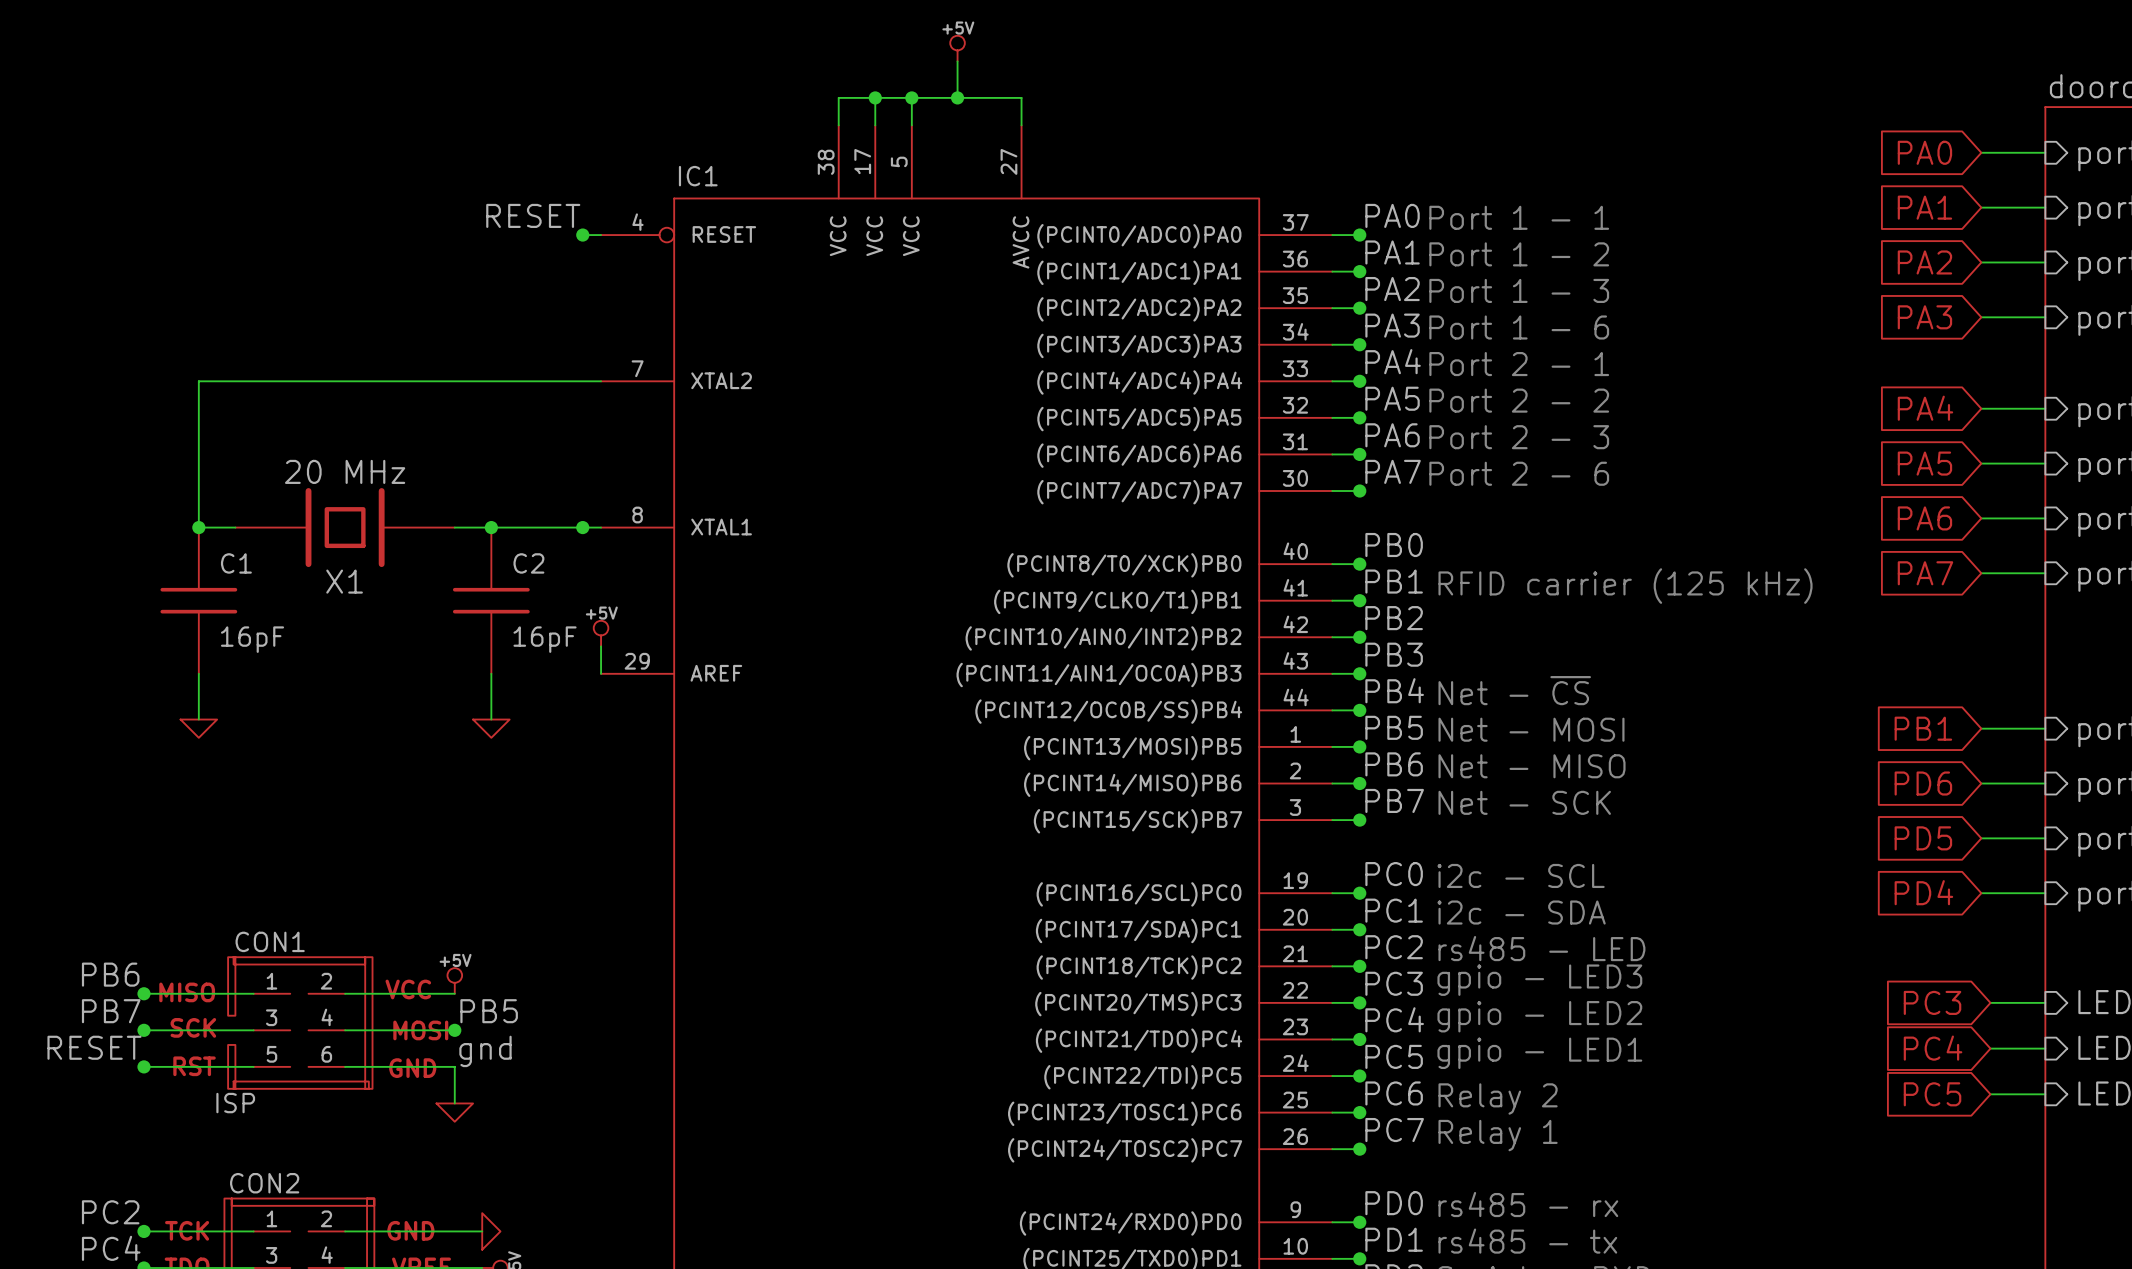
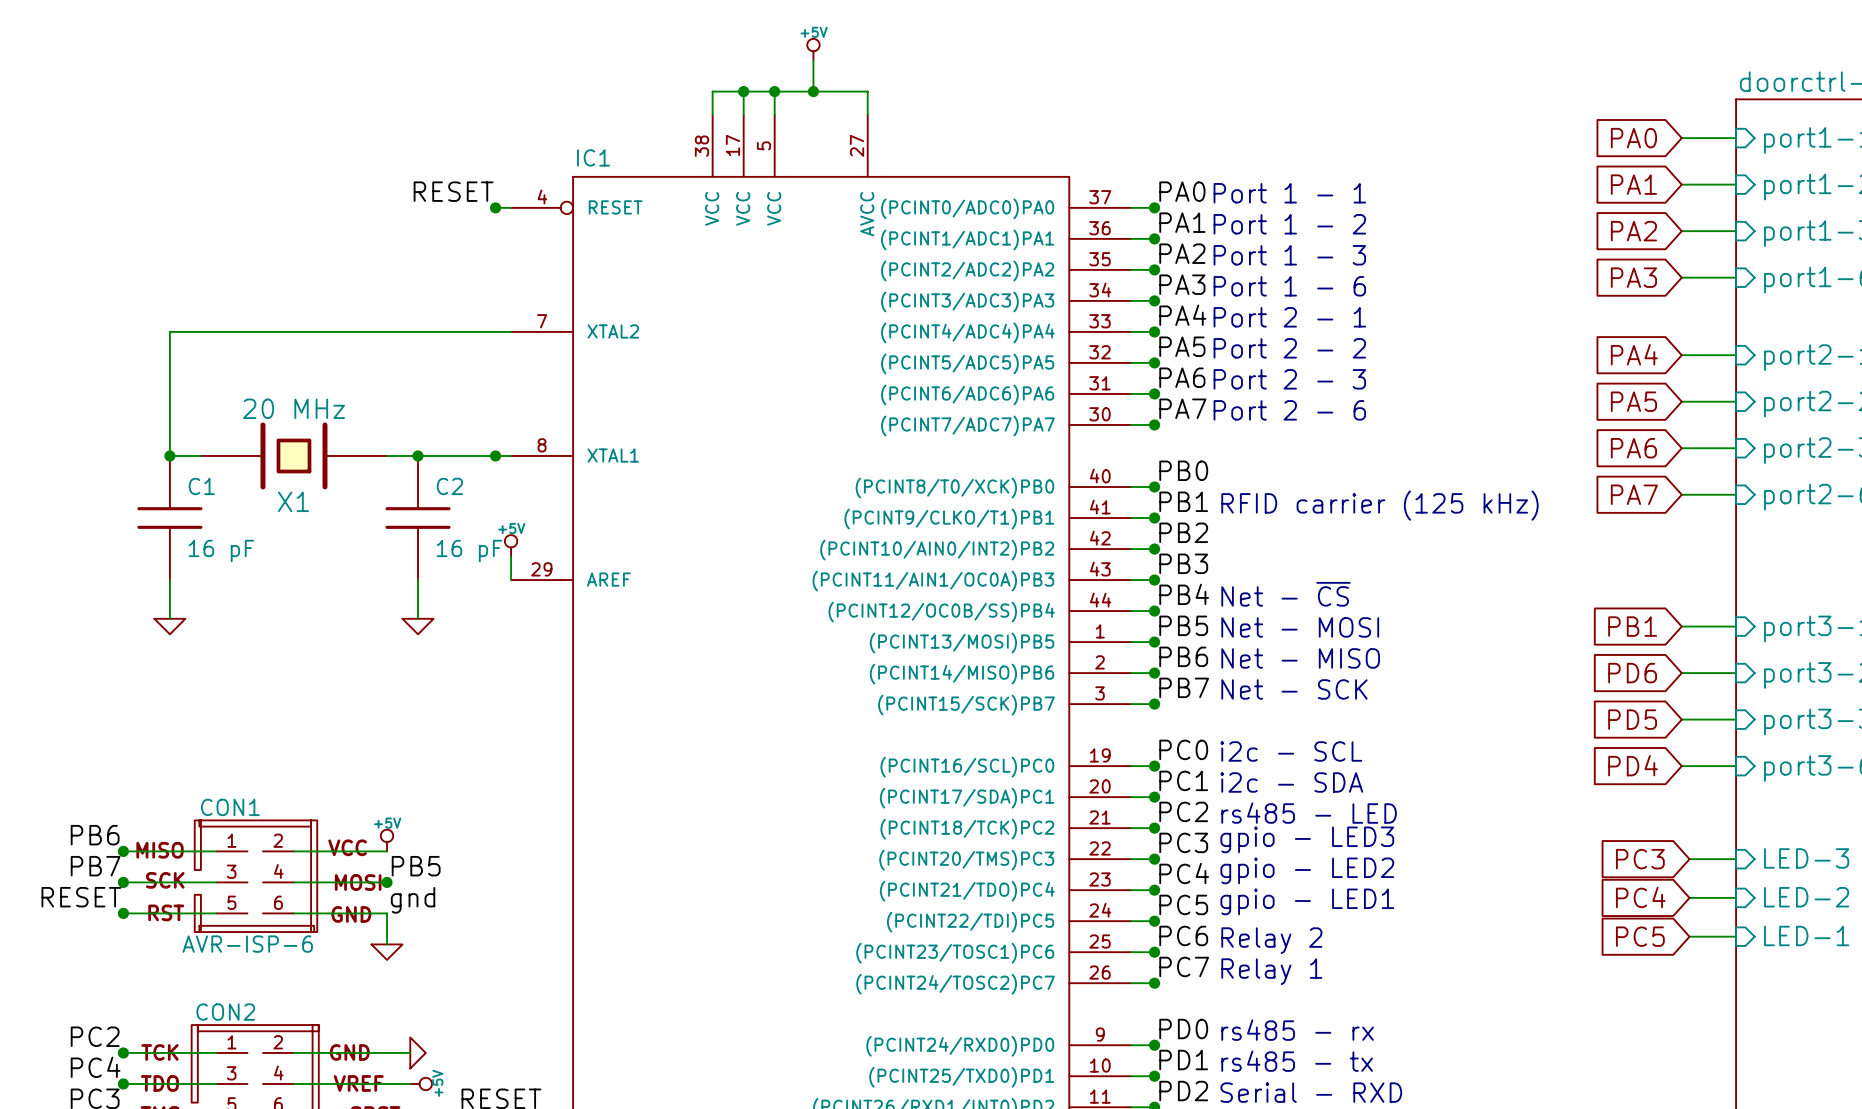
C1 value: 16pF (252, 639) -> 16 pF (221, 551)
C2 value: 16pF (545, 639) -> 16 pF (469, 551)
CON1 value: ISP (235, 1103) -> AVR-ISP-6 (247, 944)

